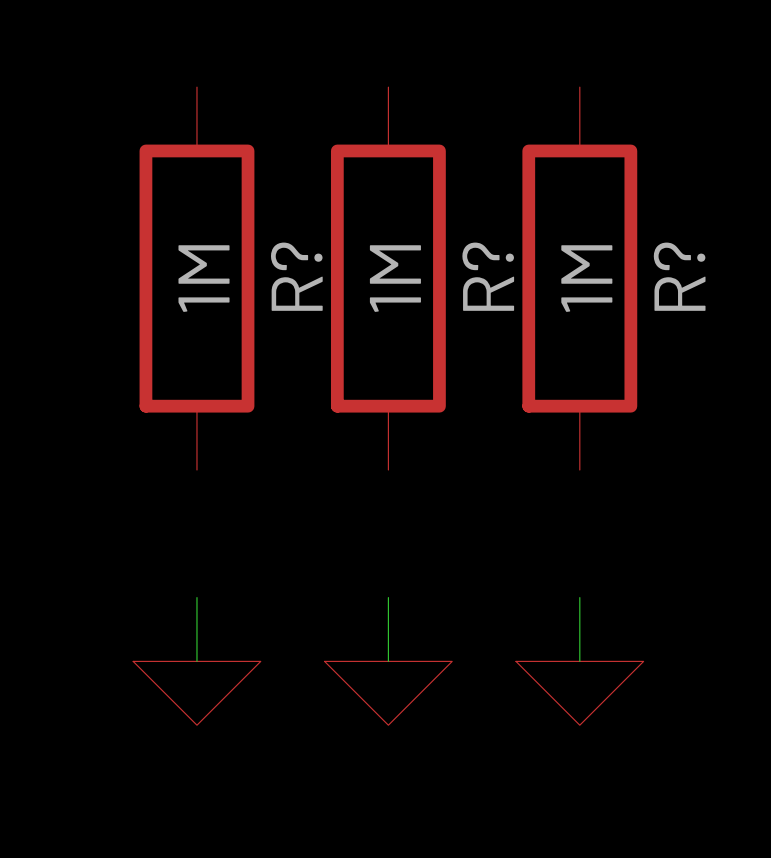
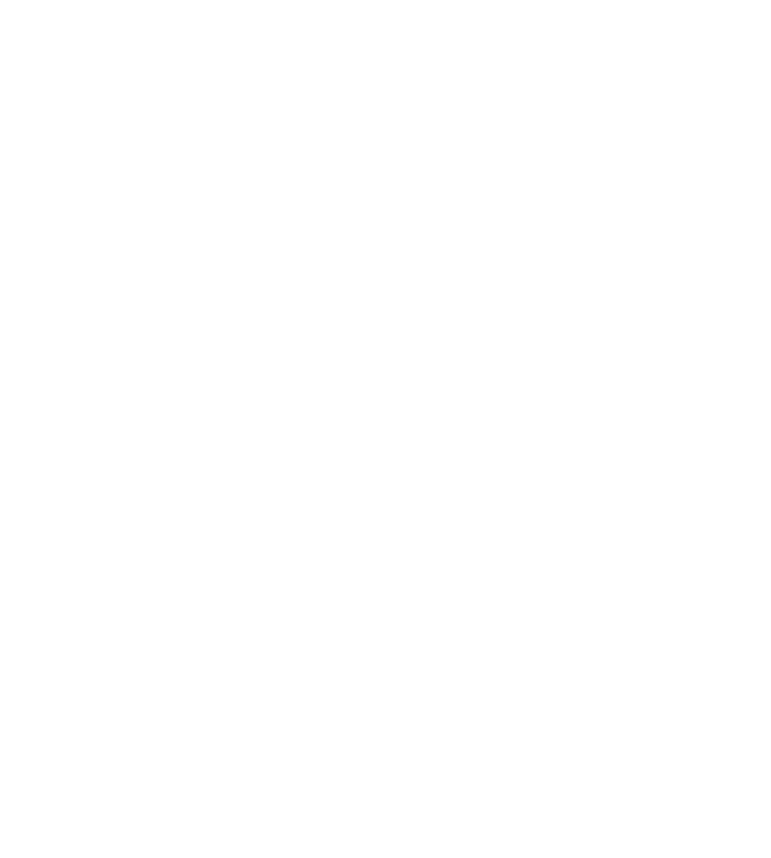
R?: 1M (196, 278) -> none
R?: 1M (388, 278) -> none
R?: 1M (579, 278) -> none
wire: (196, 597) (196, 661) -> none
wire: (388, 597) (388, 661) -> none
wire: (579, 597) (579, 661) -> none
power symbol: (196, 693) -> none
power symbol: (388, 693) -> none
power symbol: (579, 693) -> none

